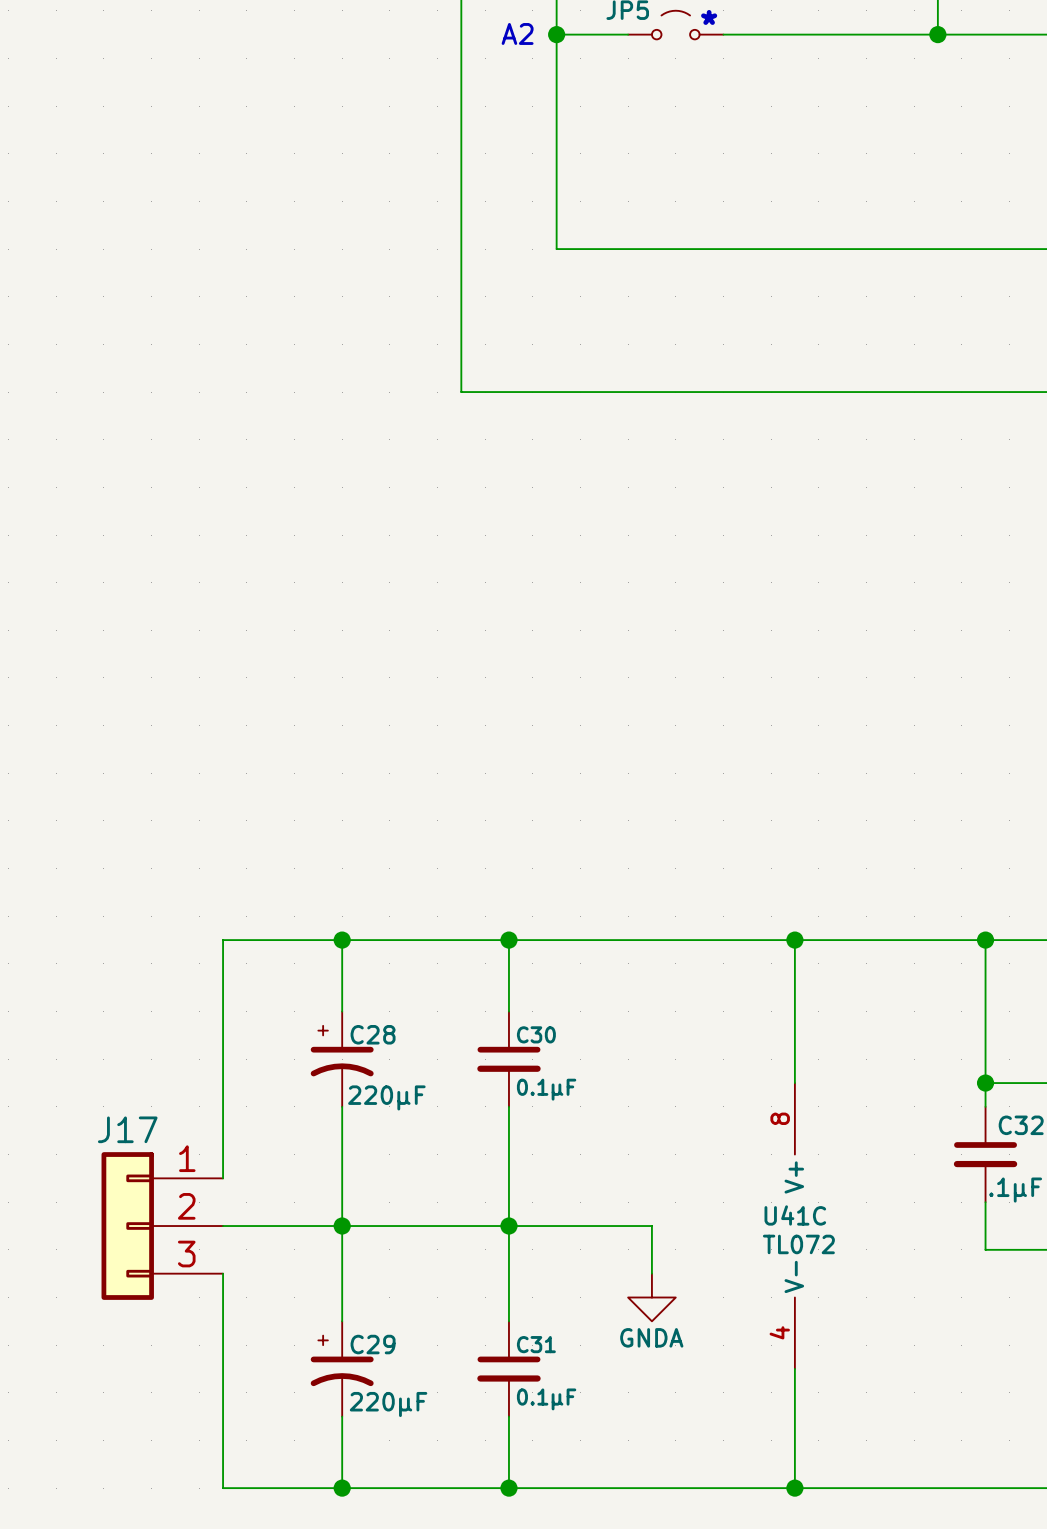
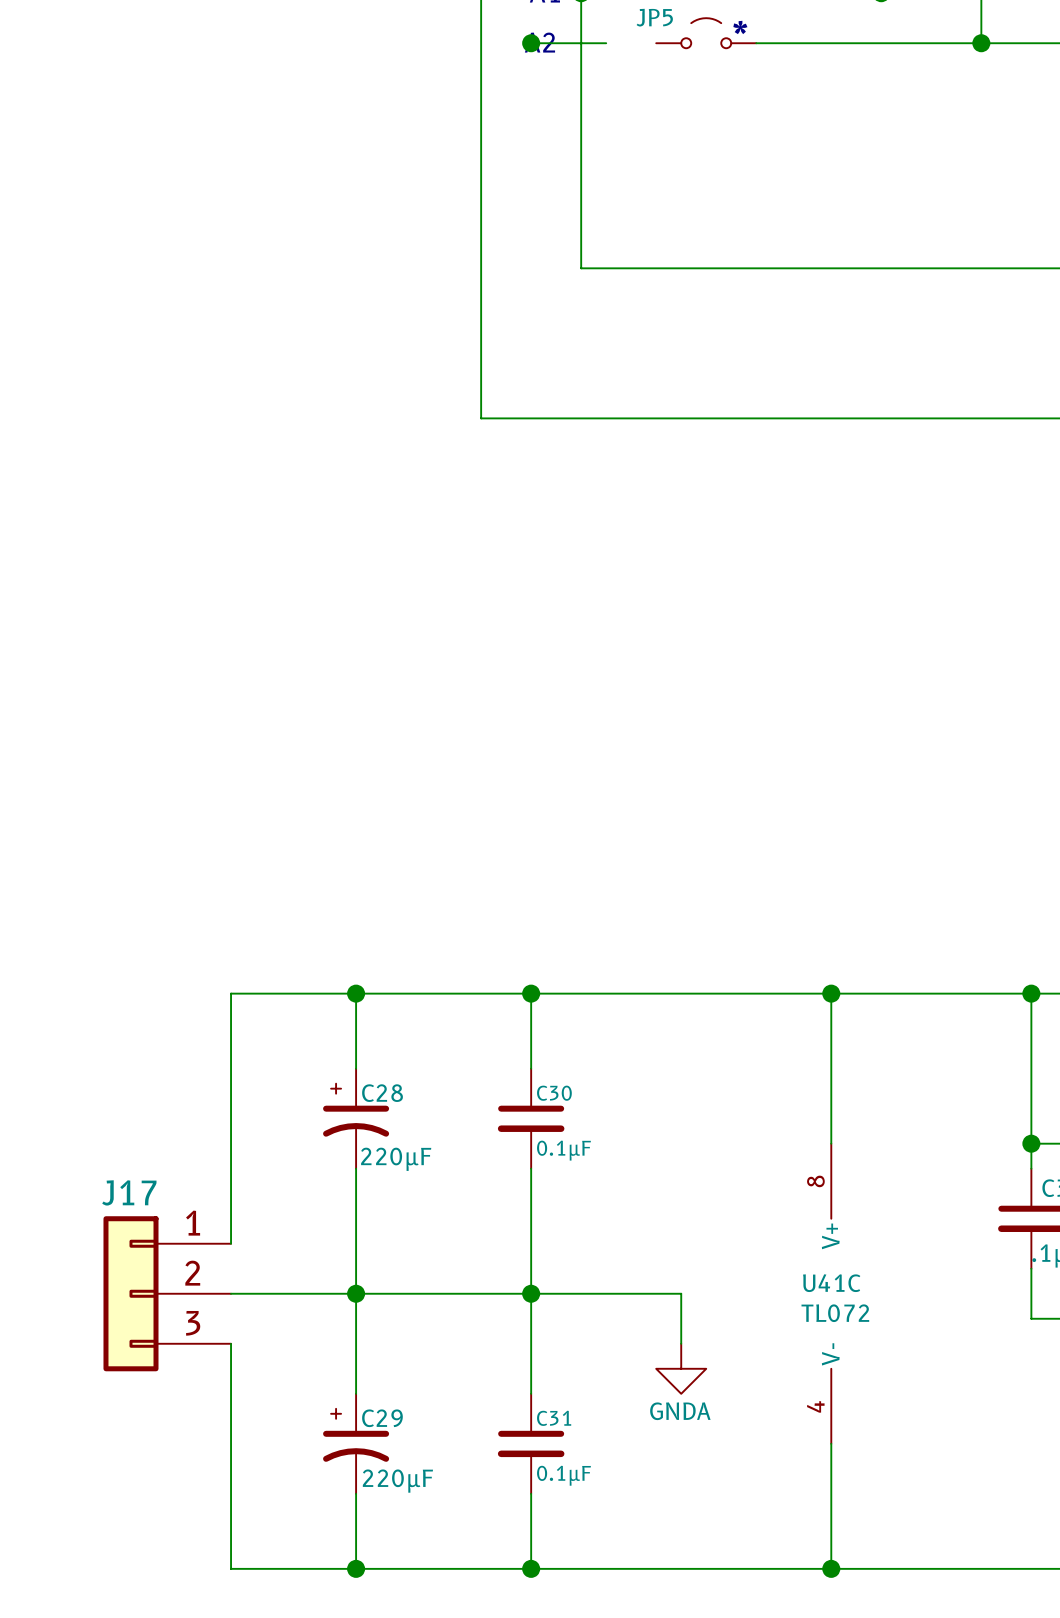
junction position: (556, 34) -> (531, 43)
wire: (580, 34) (628, 34) -> (531, 43) (581, 43)

